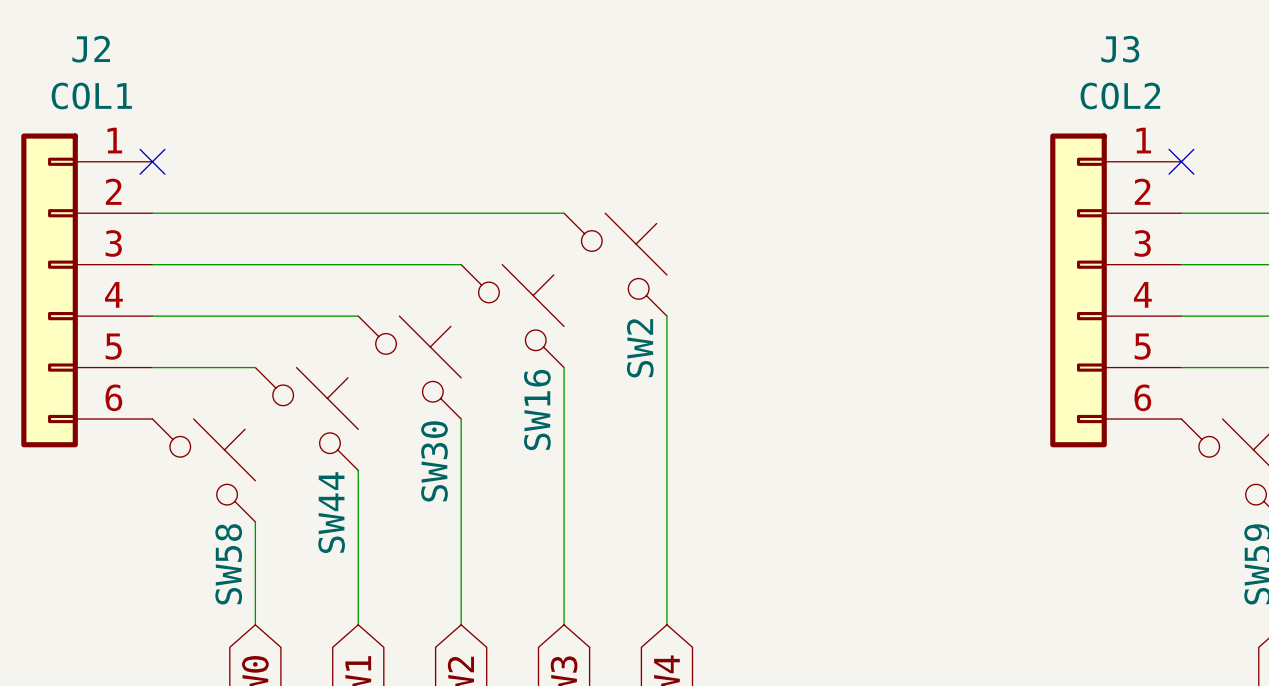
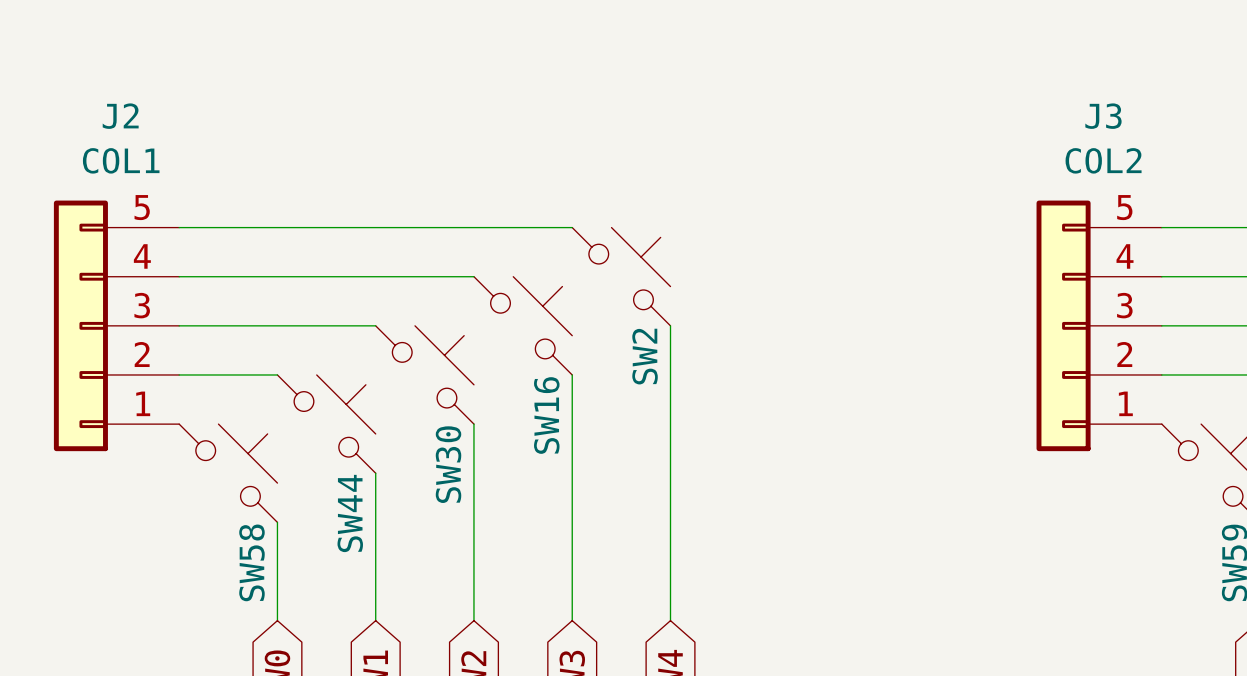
J2 symbol: [21, 133, 153, 448] -> [53, 200, 180, 452]
J3 symbol: [1050, 133, 1182, 448] -> [1036, 200, 1162, 452]
no-connect mark: (152, 161) -> none
no-connect mark: (1181, 161) -> none

